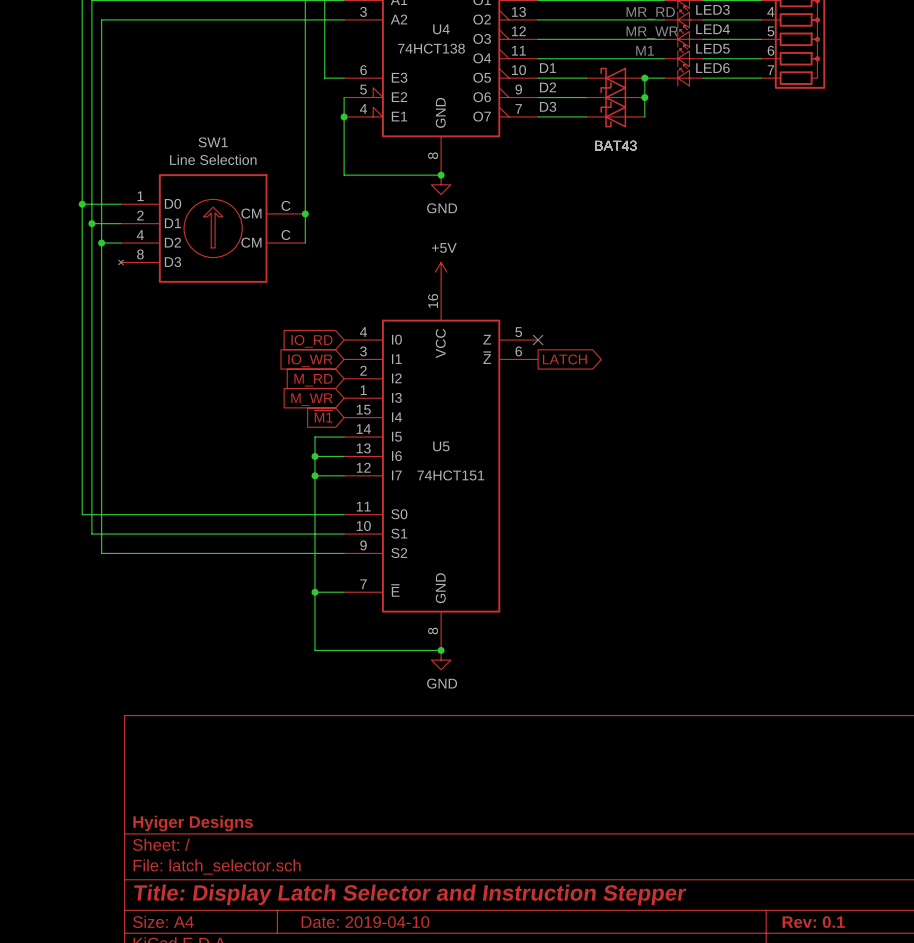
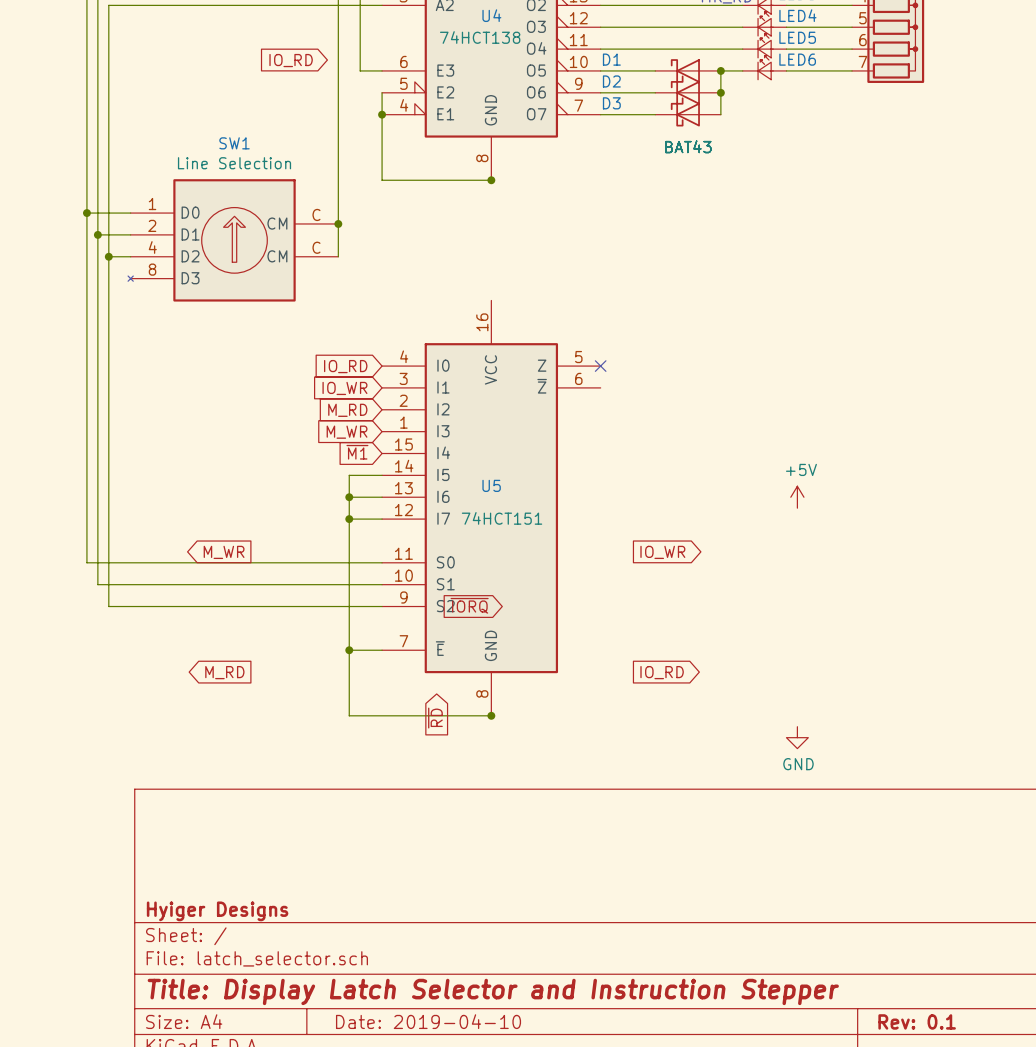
text: MR_WR (652, 32) -> none
text: M1 (645, 50) -> none
global label: none -> IO_RD (291, 60)
power symbol: GND (441, 184) -> none
power symbol: +5V (441, 272) -> none
global label: LATCH (564, 359) -> none
power symbol: none -> +5V (797, 497)
global label: none -> M_WR (224, 552)
global label: none -> IO_WR (662, 552)
global label: none -> ~{IORQ} (469, 605)
global label: none -> IO_RD (662, 672)
global label: none -> M_RD (224, 672)
global label: none -> ~{RD} (435, 718)
power symbol: GND (441, 660) -> none
power symbol: none -> GND (797, 737)

